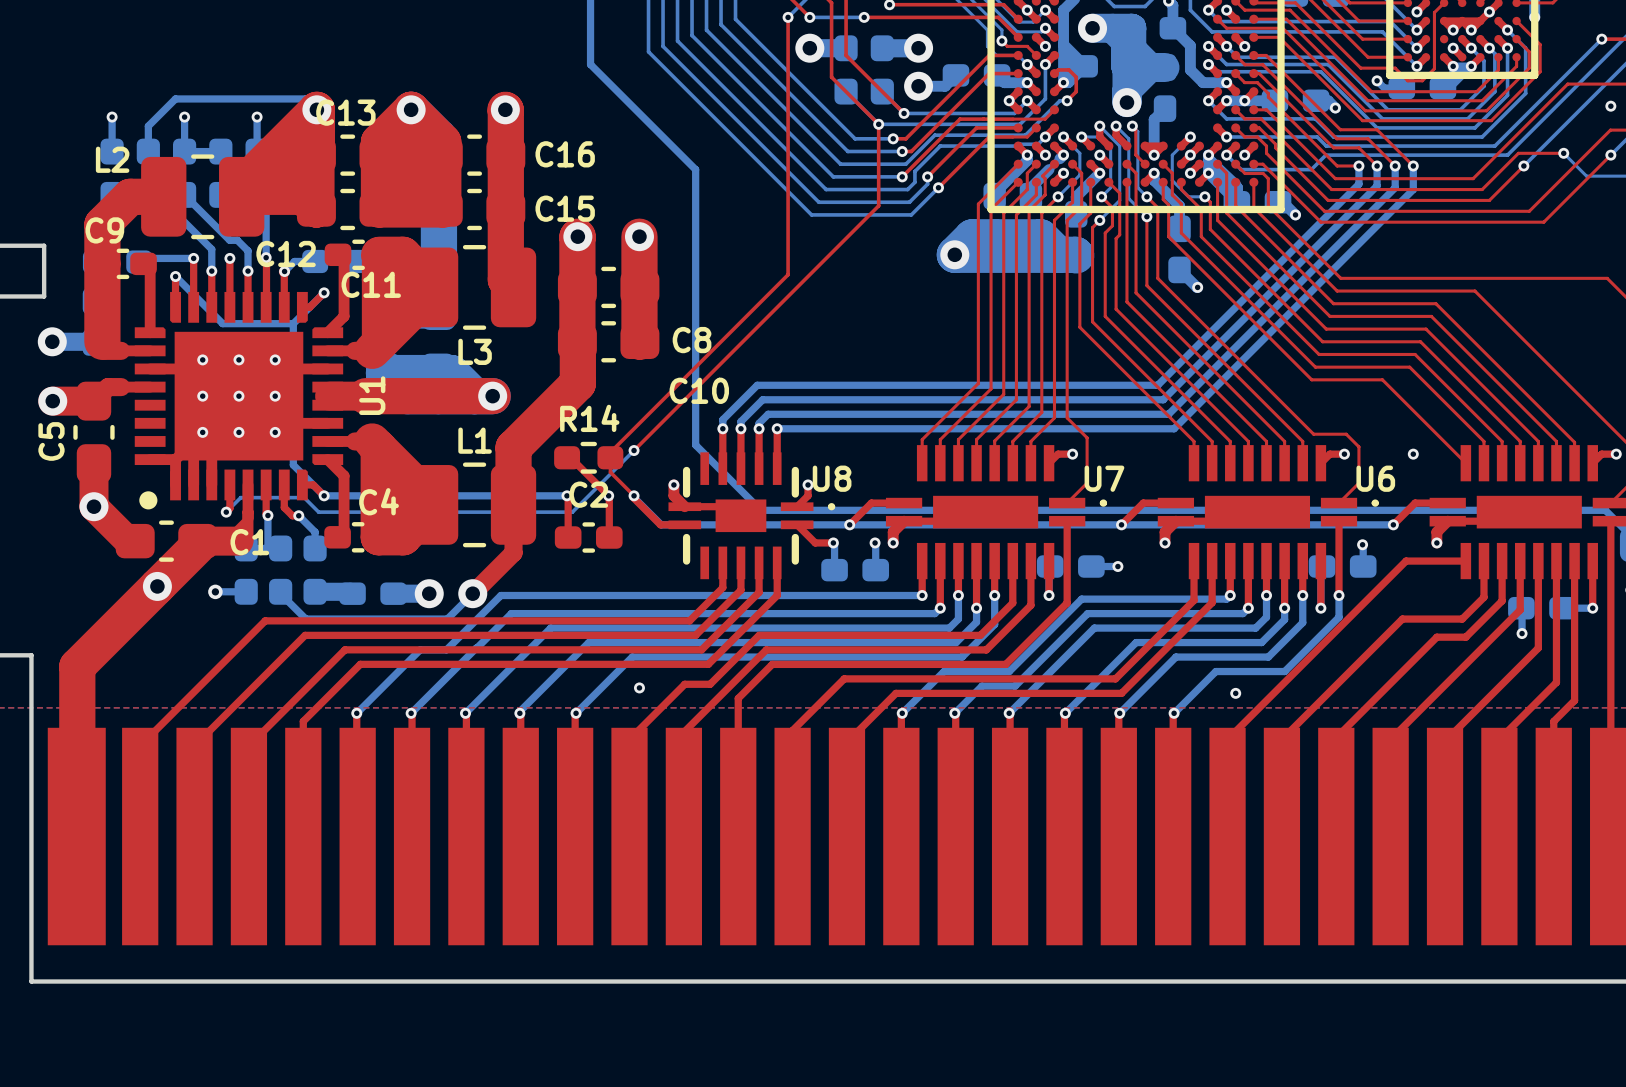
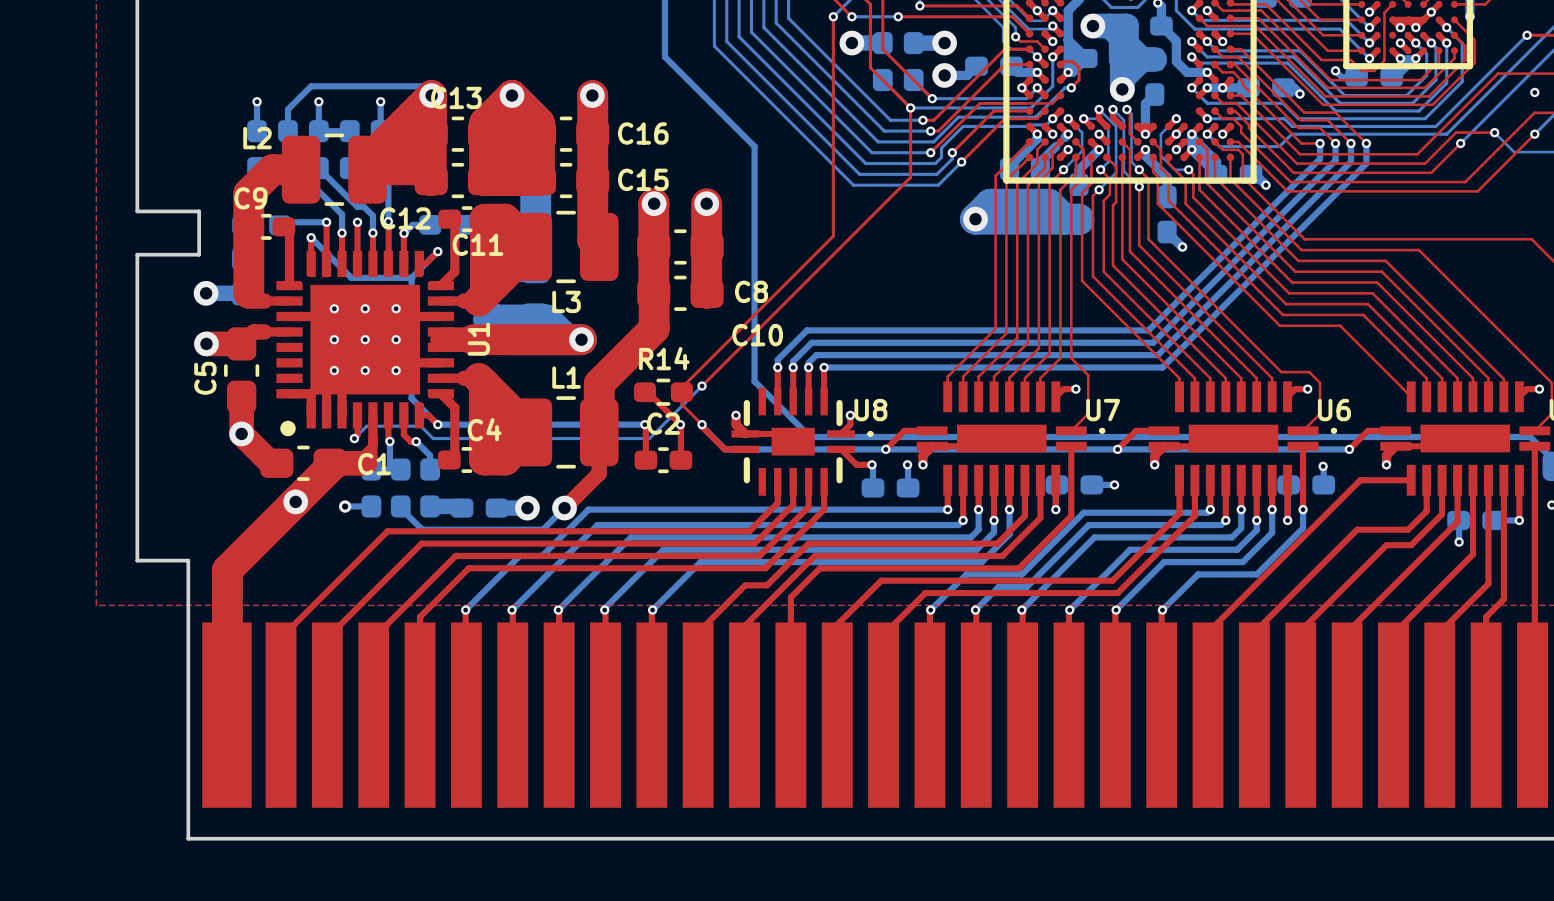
via: (1413, 454) -> none
via: (639, 687) -> none
via: (1235, 693) -> none

